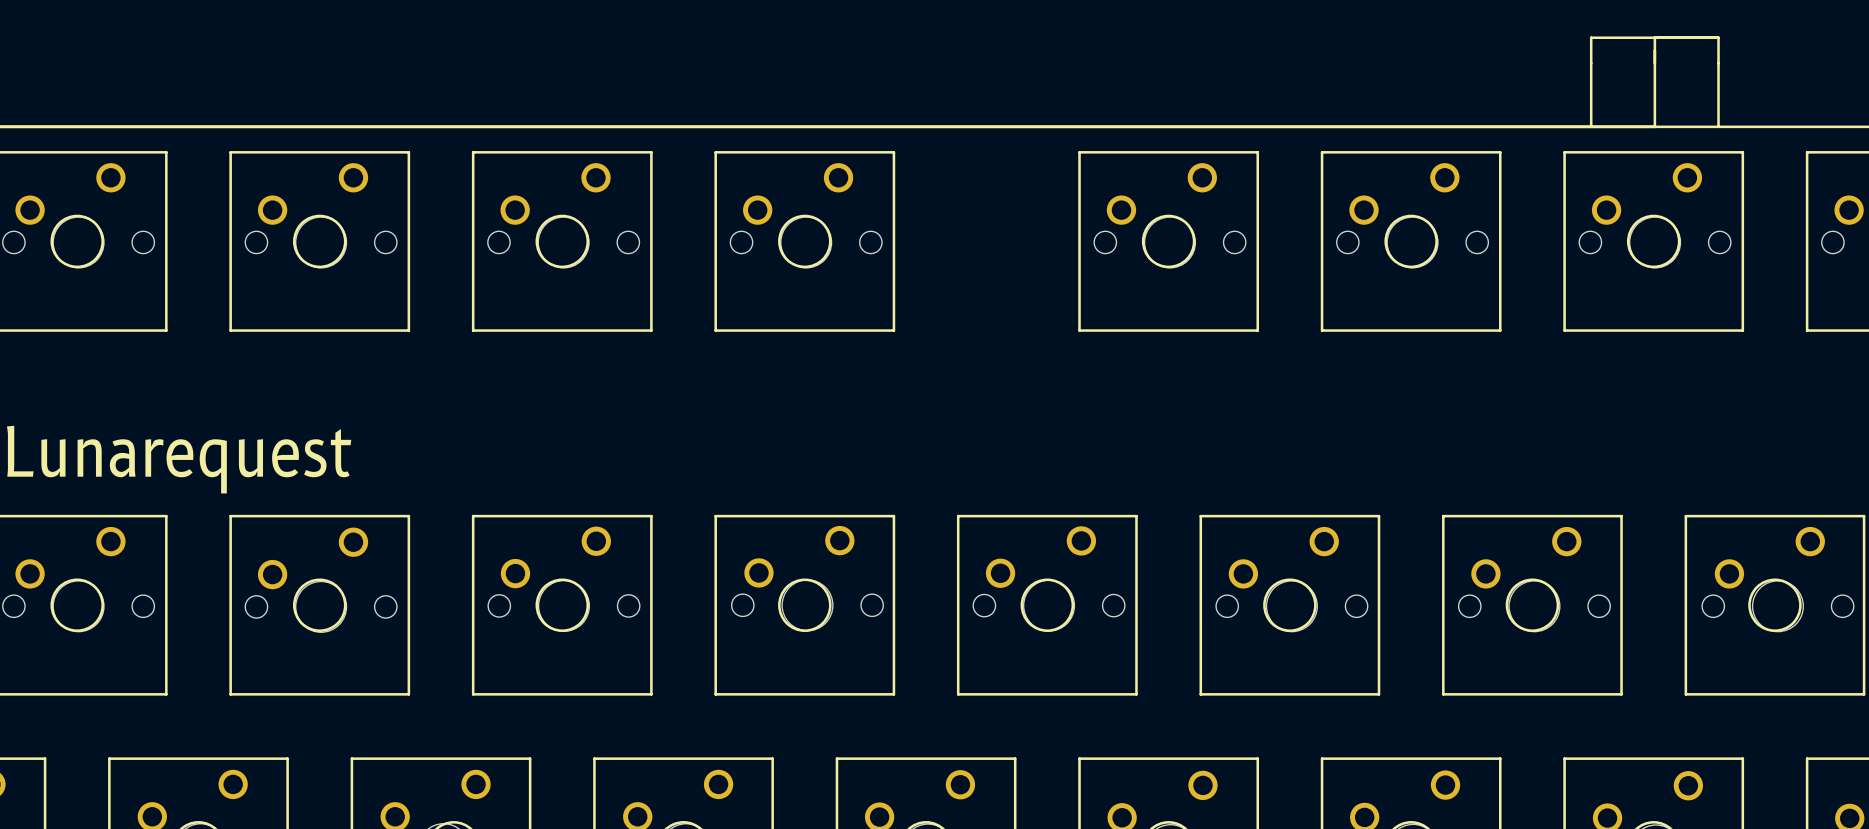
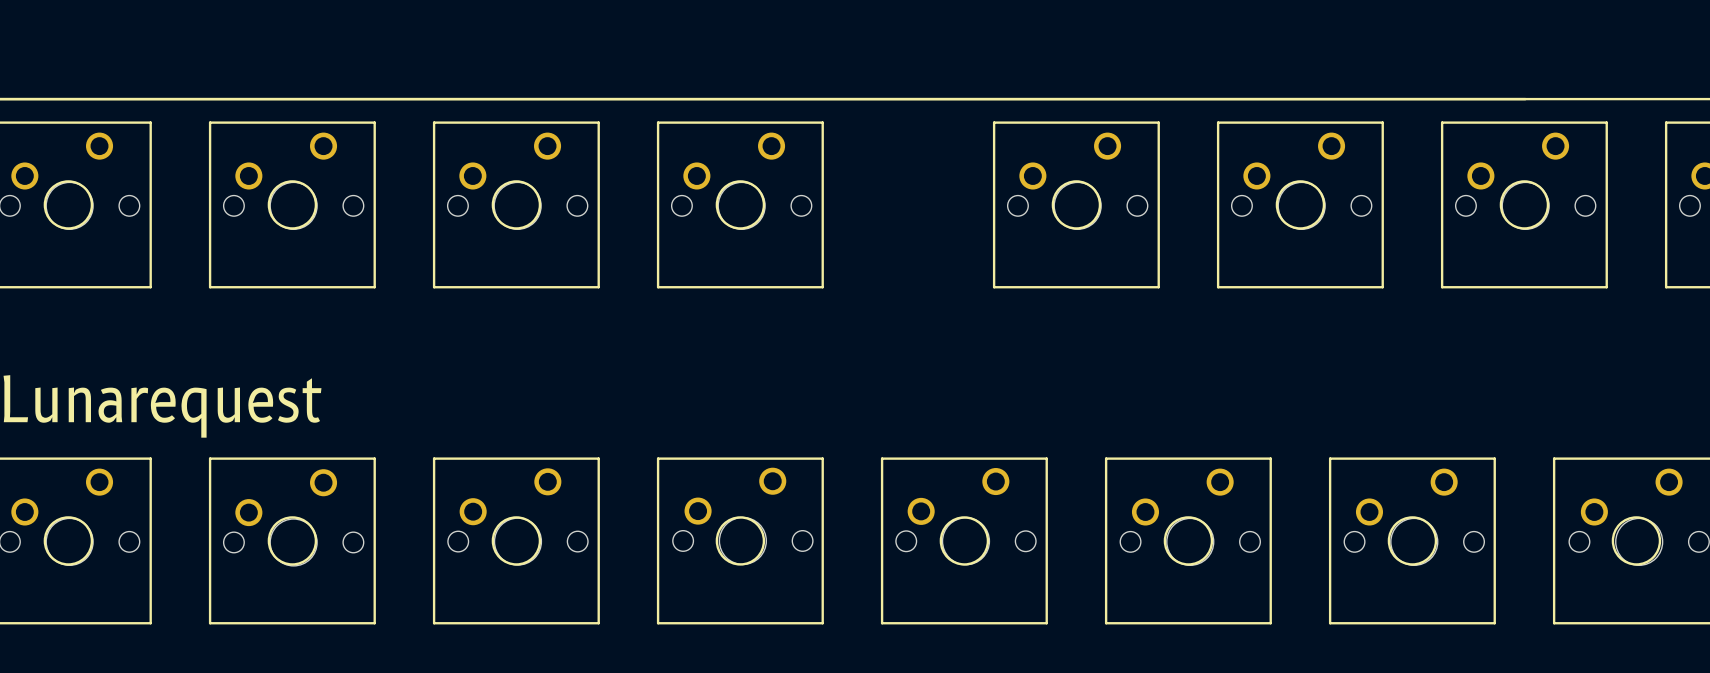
line: (1654, 37) (1654, 126) -> none
line: (1591, 126) (1591, 37) (1718, 37) (1718, 126) -> none

